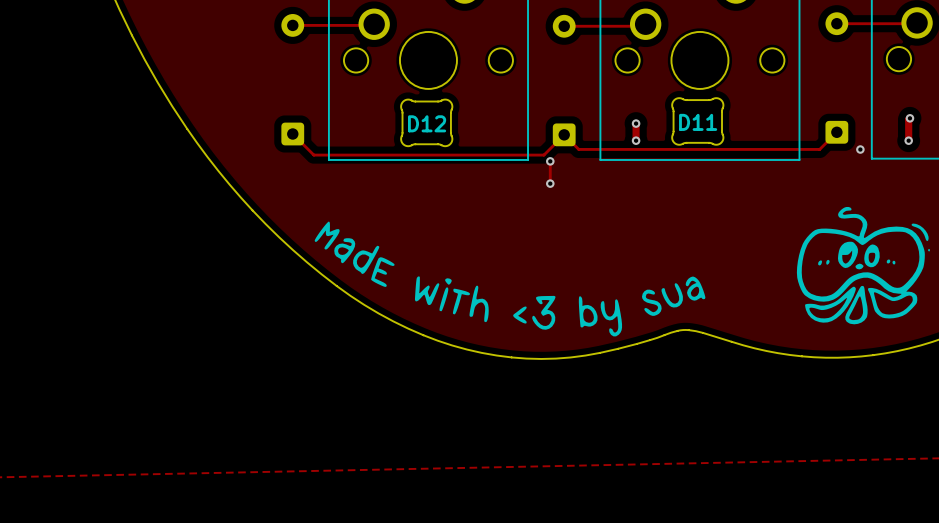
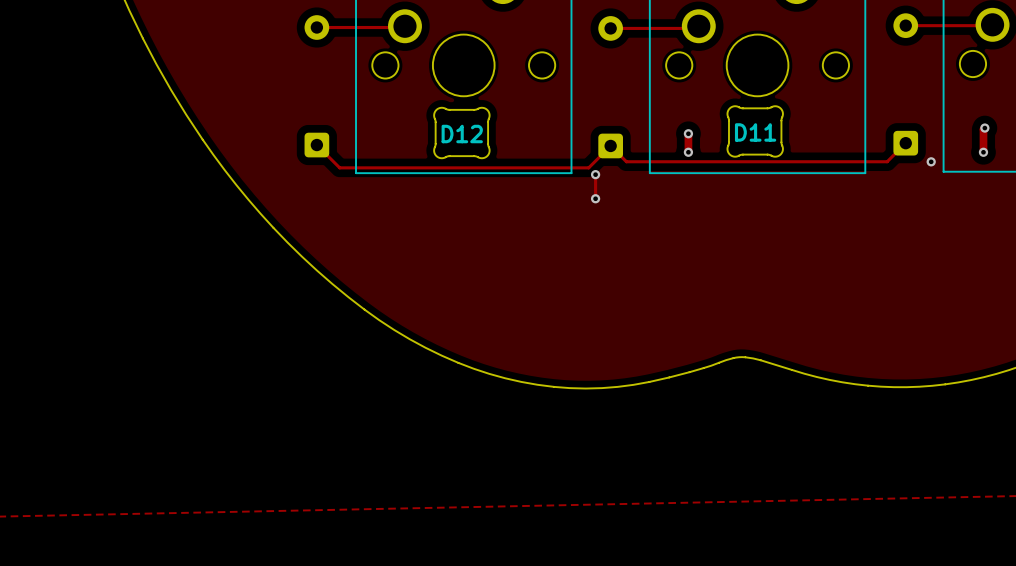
drawing: [796, 206, 931, 325] -> none
drawing: [314, 221, 706, 337] -> none

